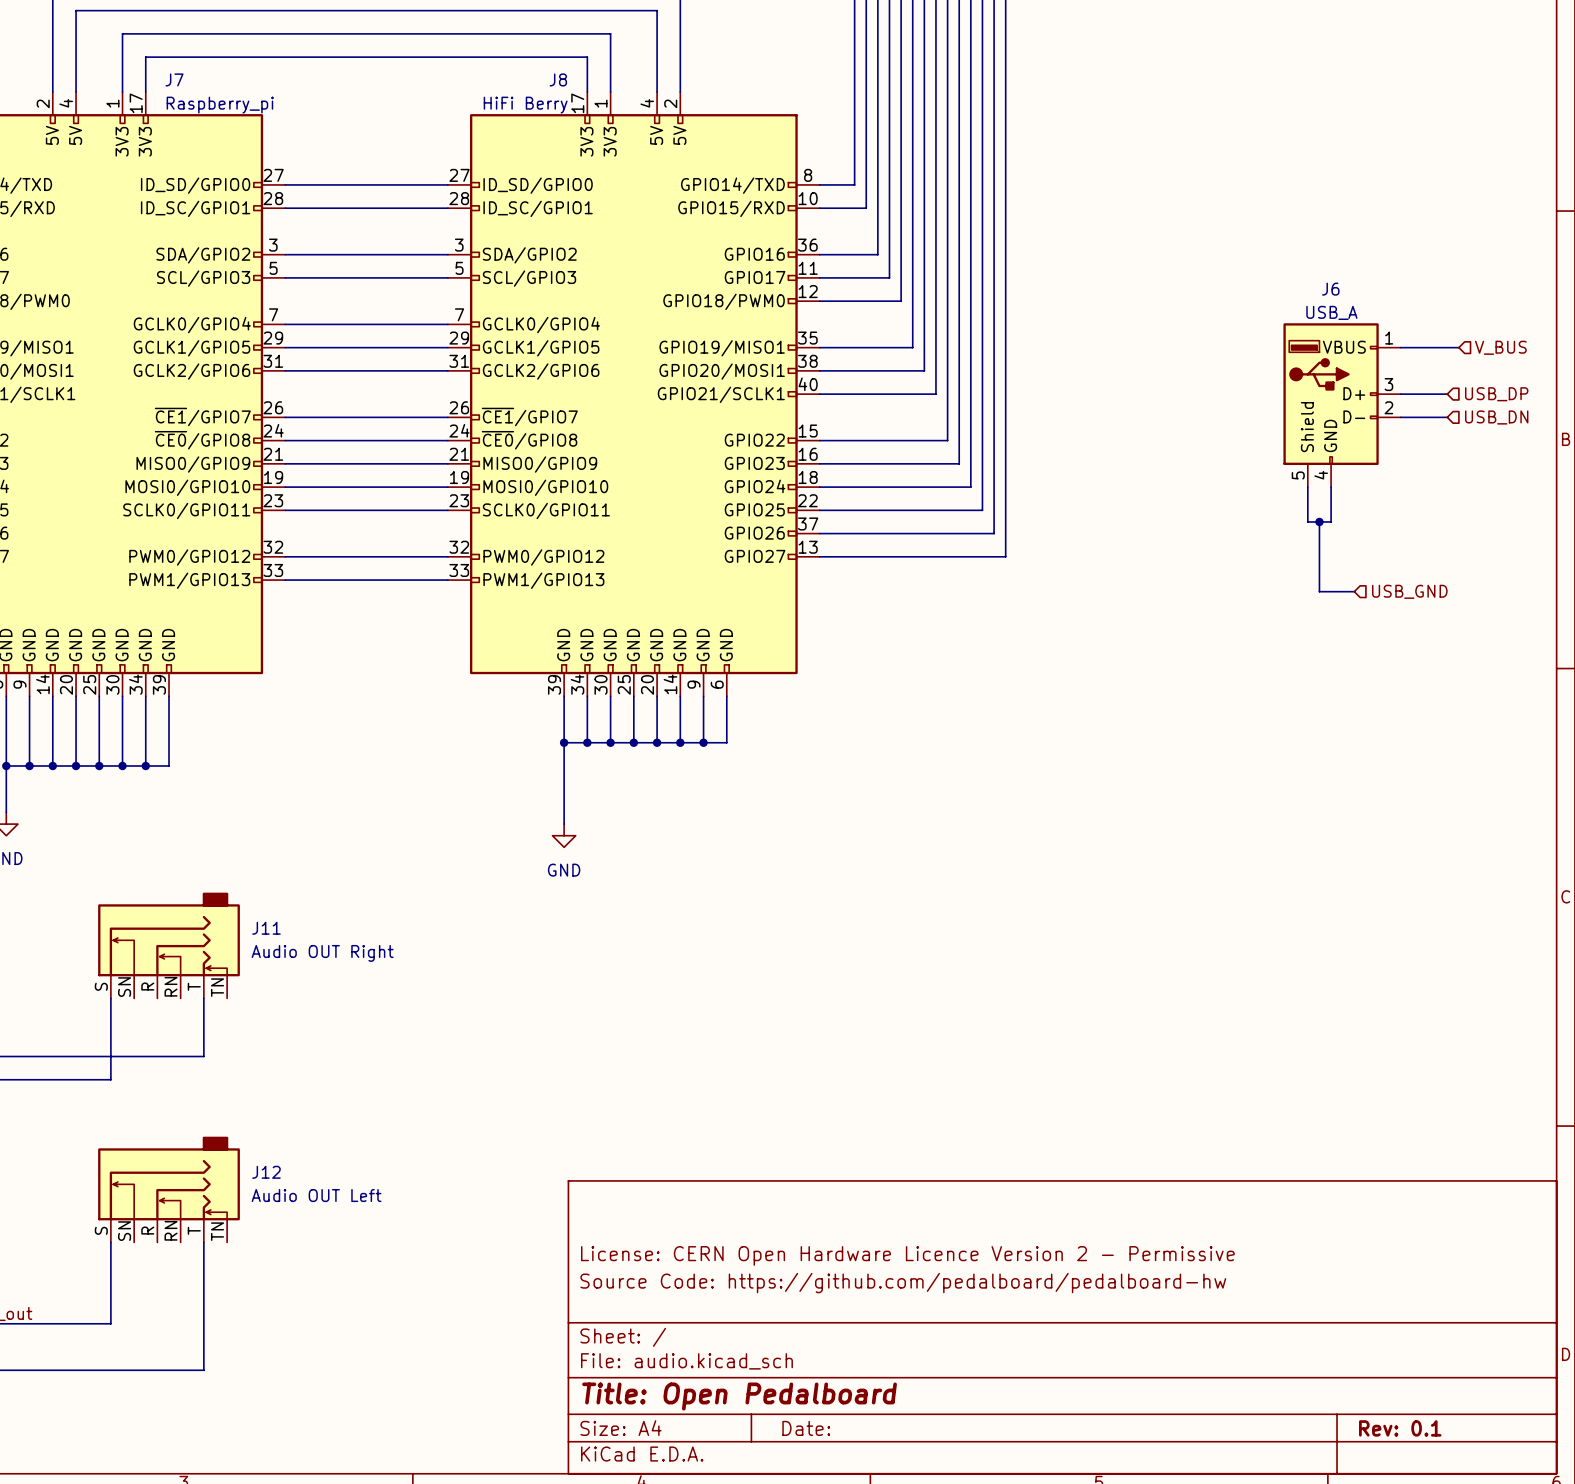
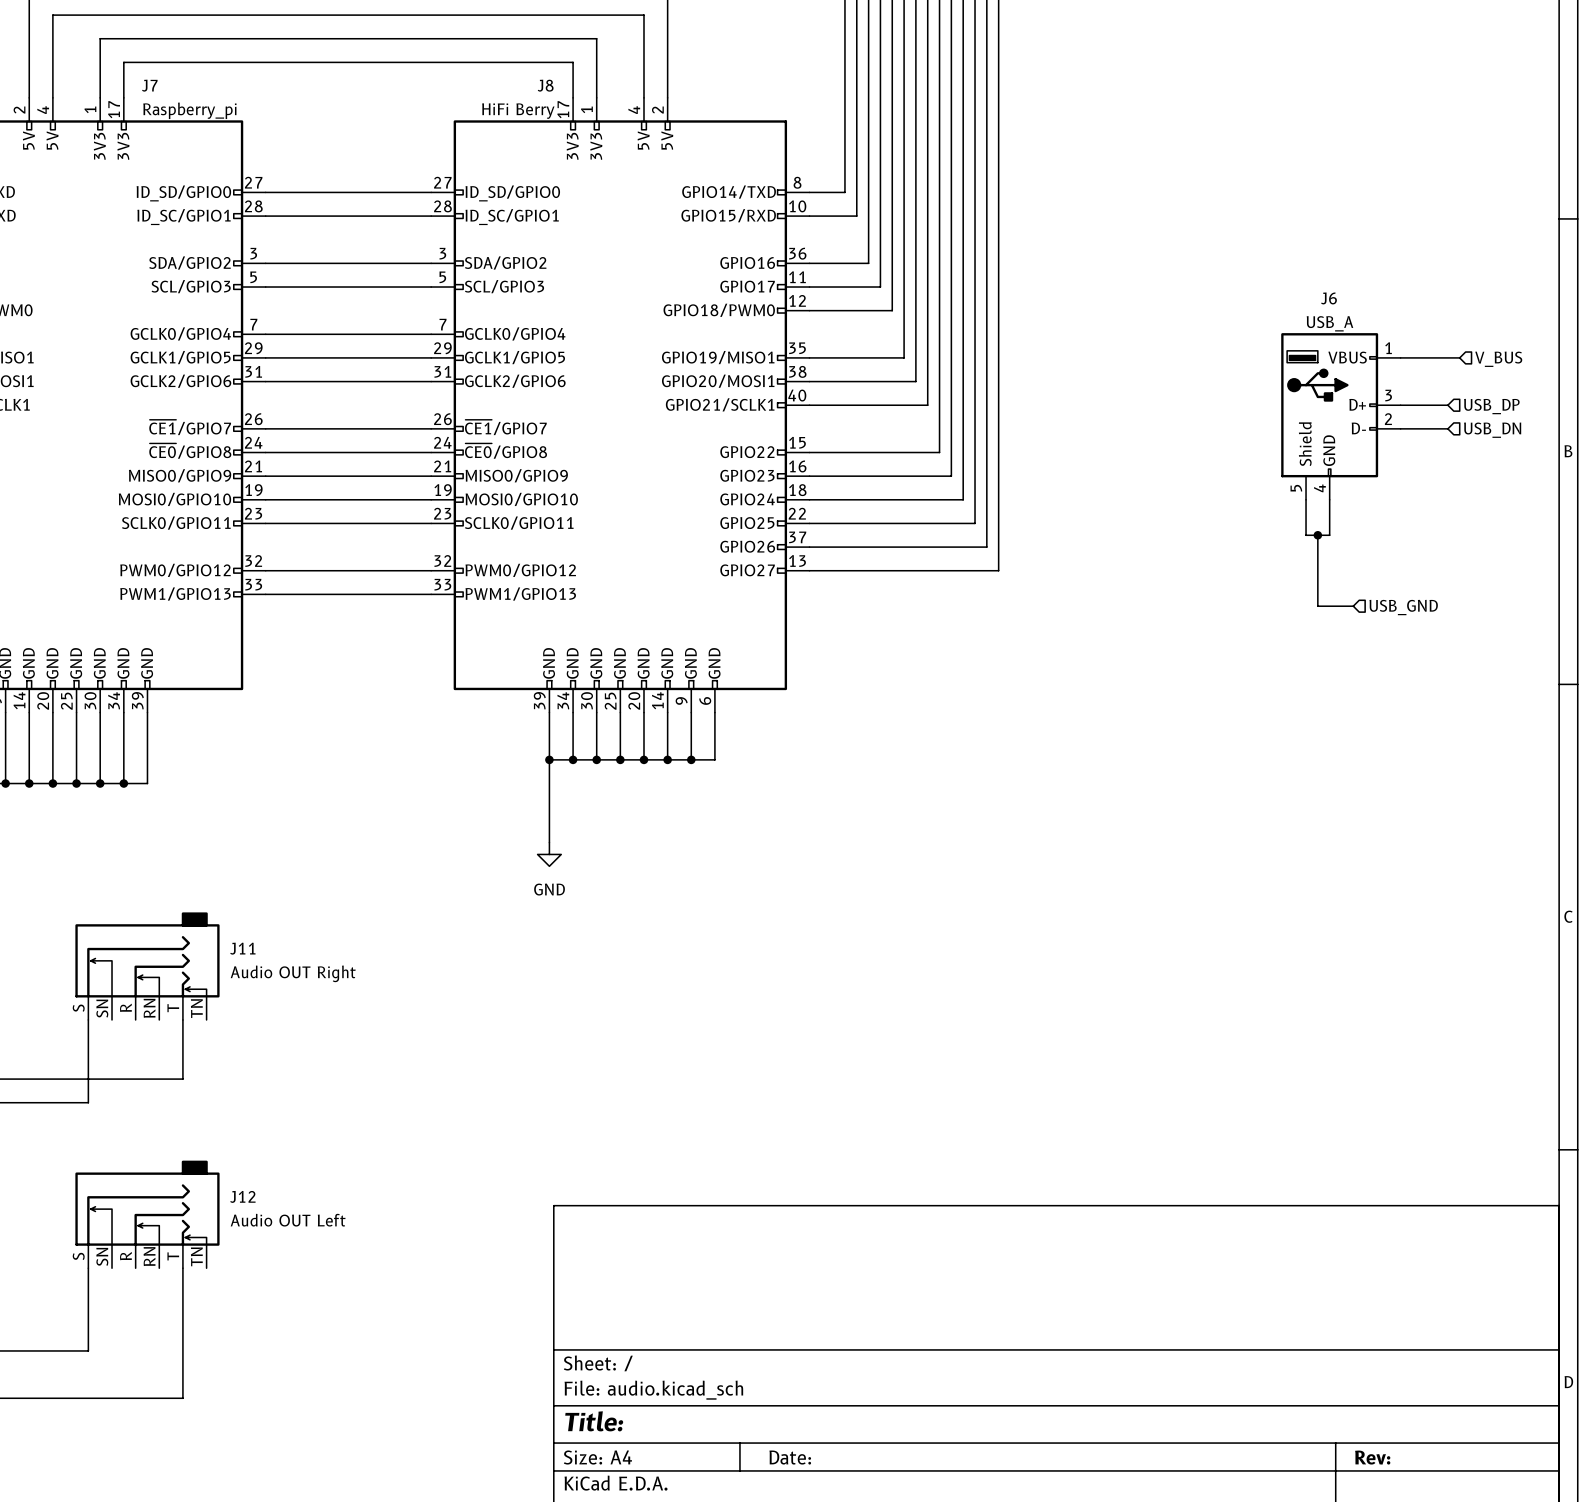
title block: License: CERN Open Hardware Licence Version 2 - Permissive (907, 1255) -> none
title block: Source Code: https://github.com/pedalboard/pedalboard-hw (903, 1283) -> none
title block: Title: Open Pedalboard (739, 1396) -> Title: (594, 1421)
title block: Rev: 0.1 (1400, 1428) -> Rev: (1372, 1457)

